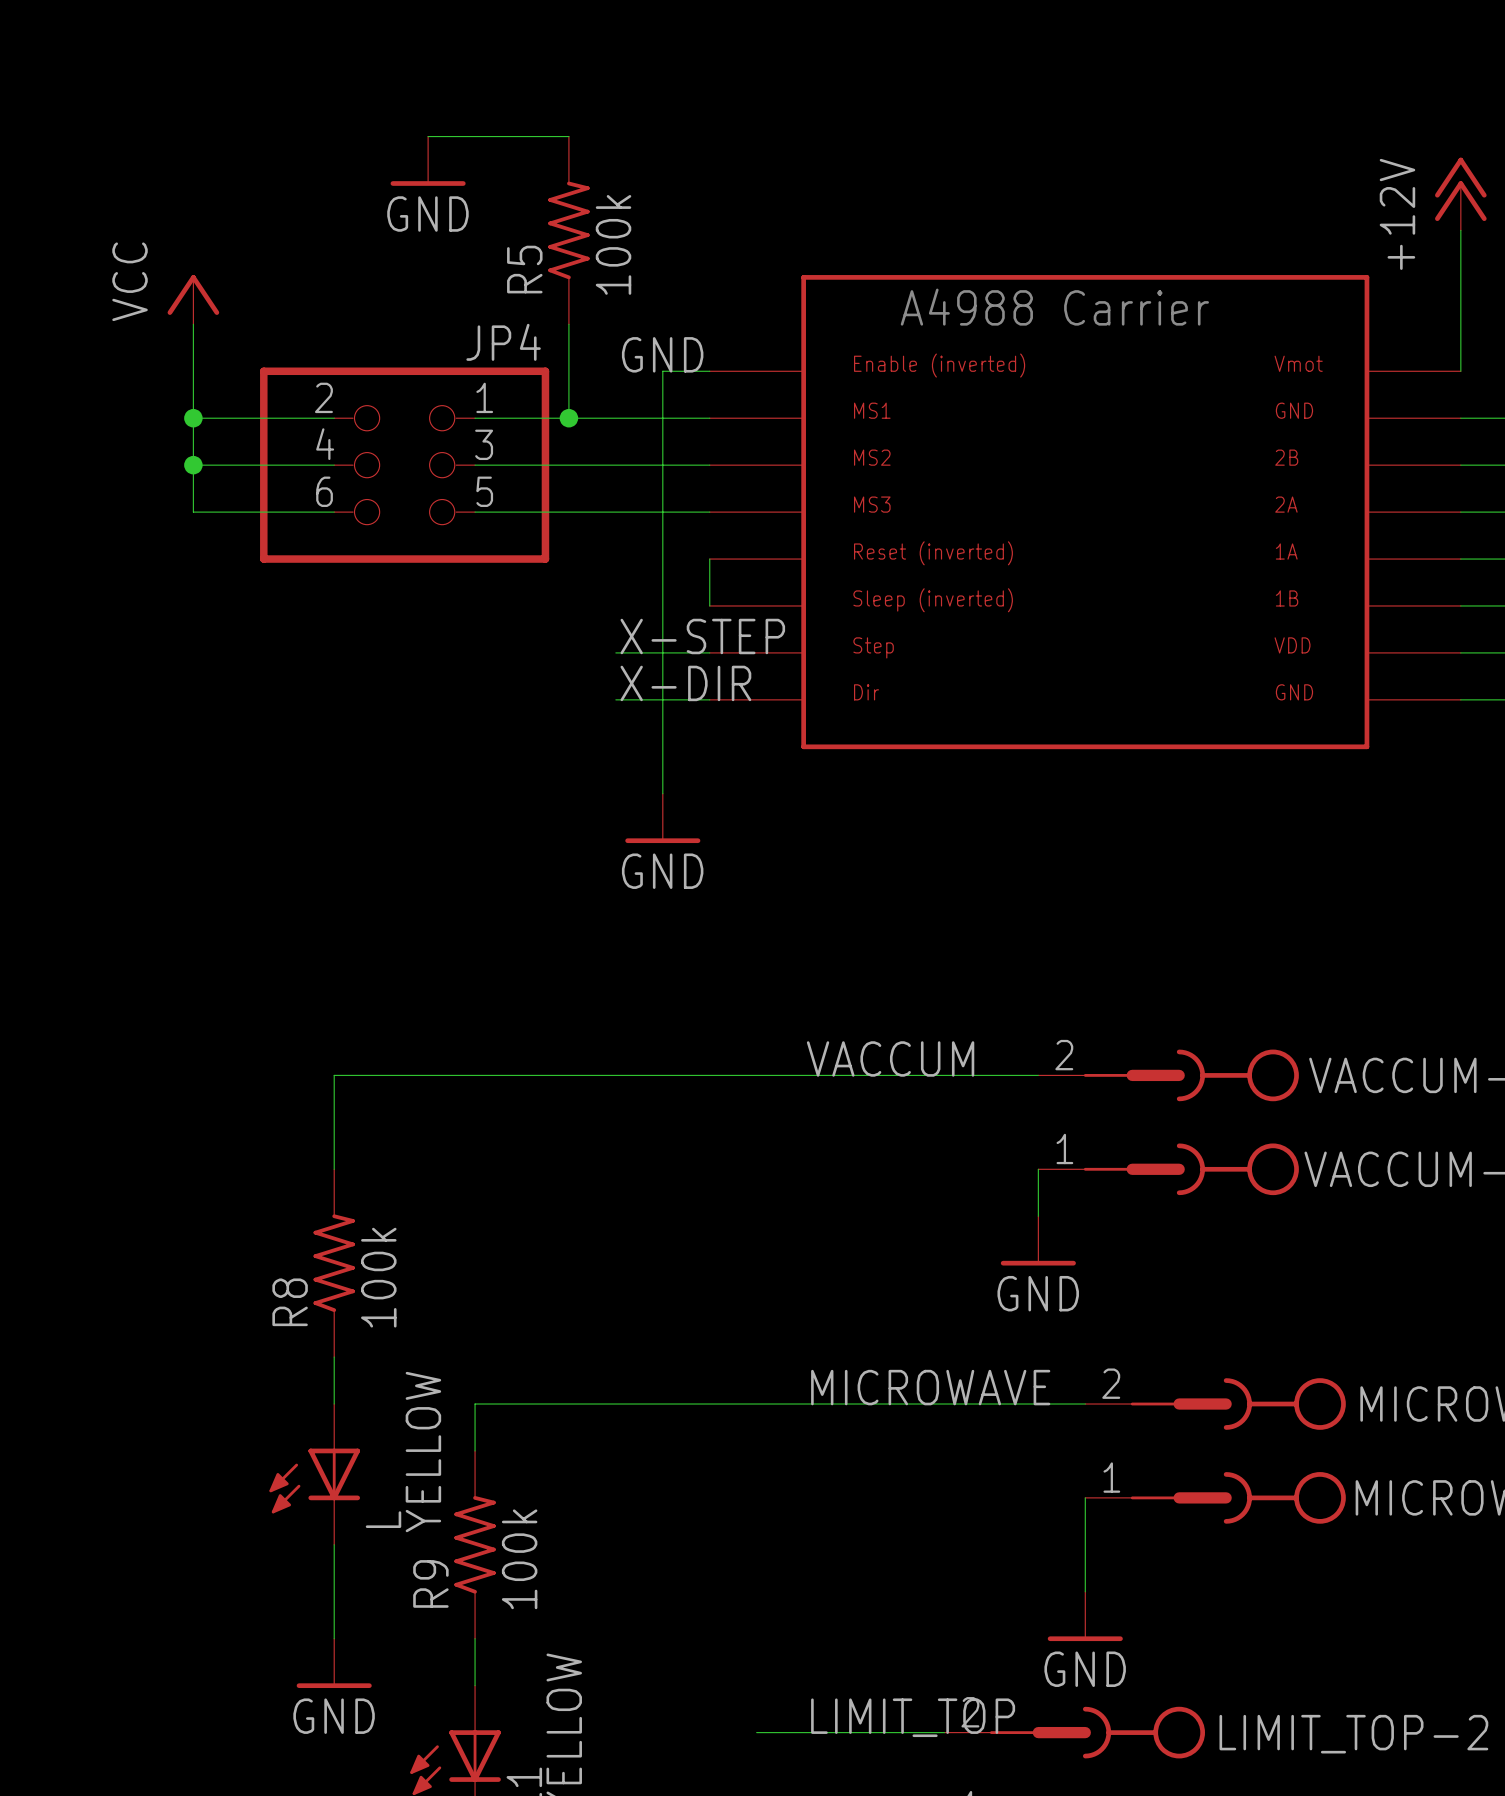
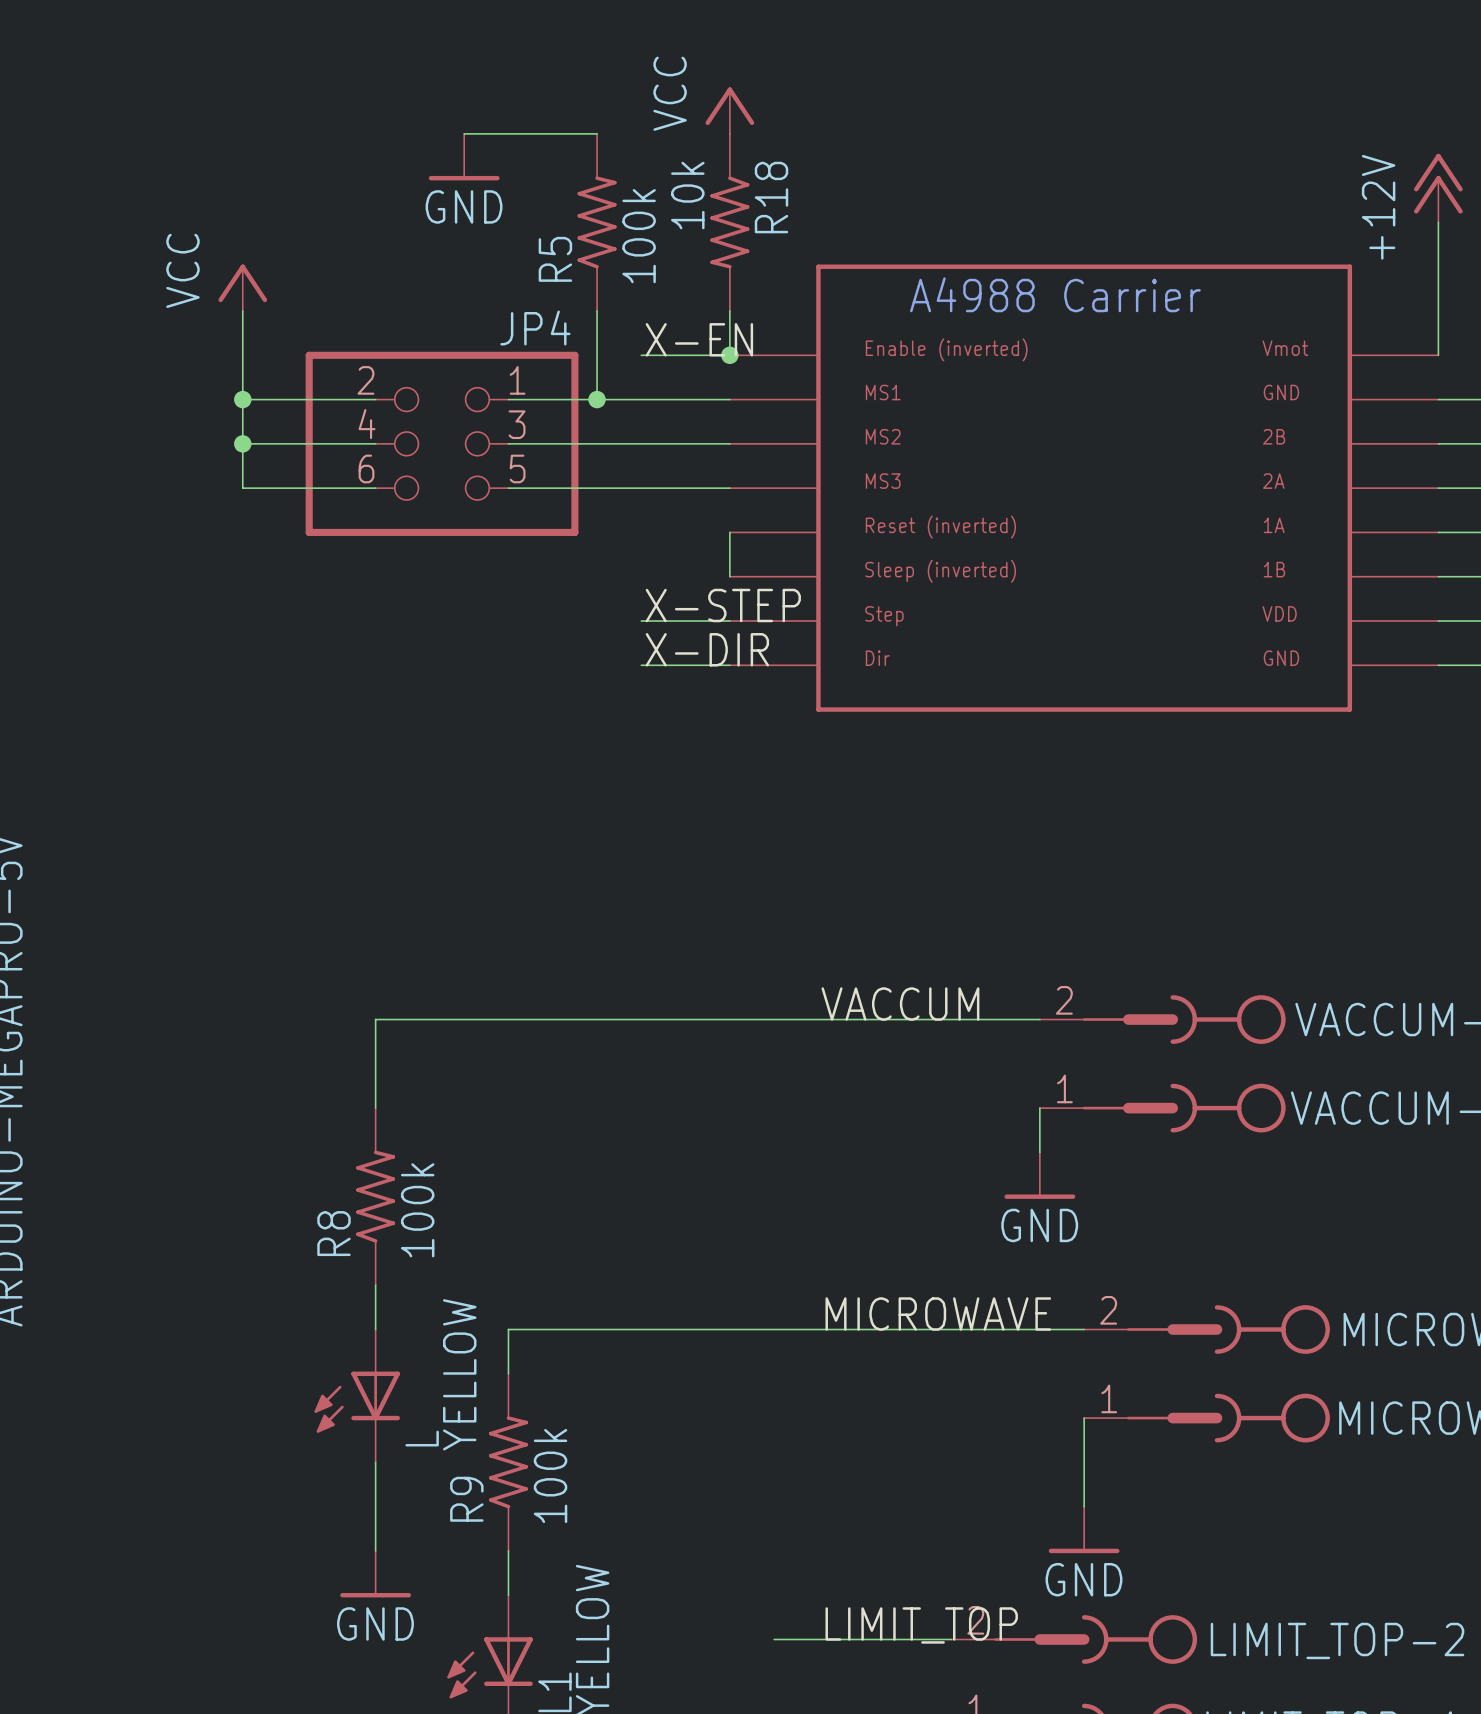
power symbol: none -> VCC (729, 110)
R18: none -> 10k (729, 222)
wire: none -> (729, 311) (729, 355)
label: GND (662, 354) -> X-EN (699, 339)
wire: (662, 371) (662, 793) -> (685, 355) (641, 355)
junction: none -> (729, 355)
power symbol: GND (662, 818) -> none

